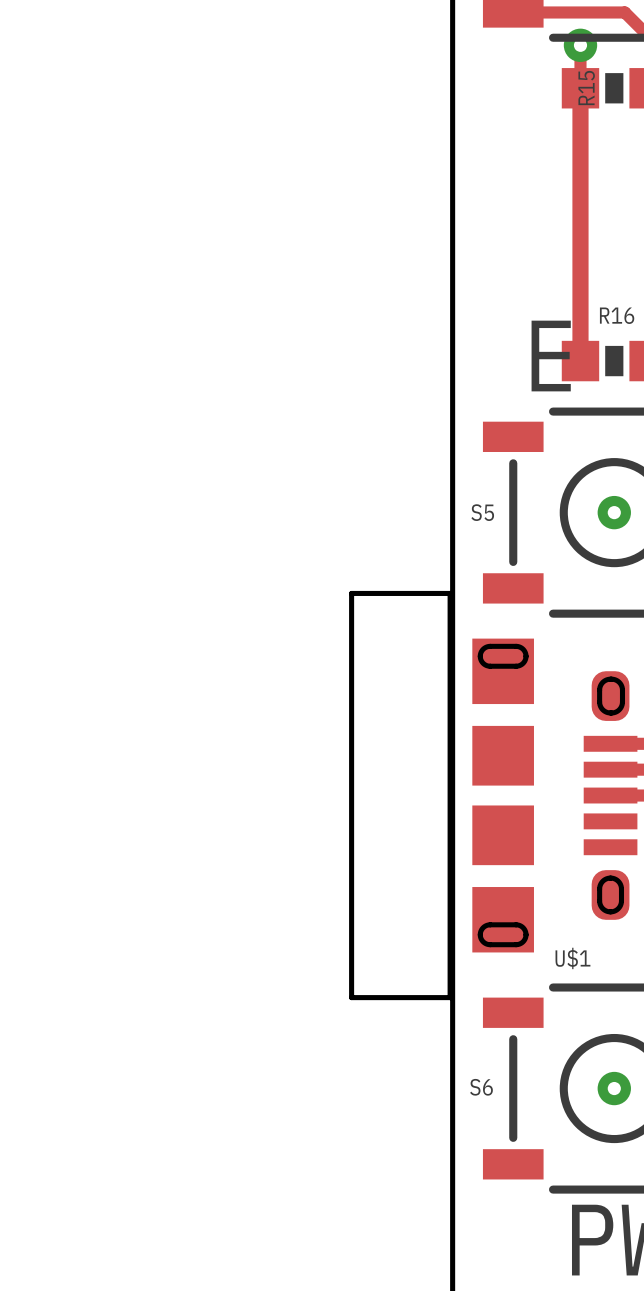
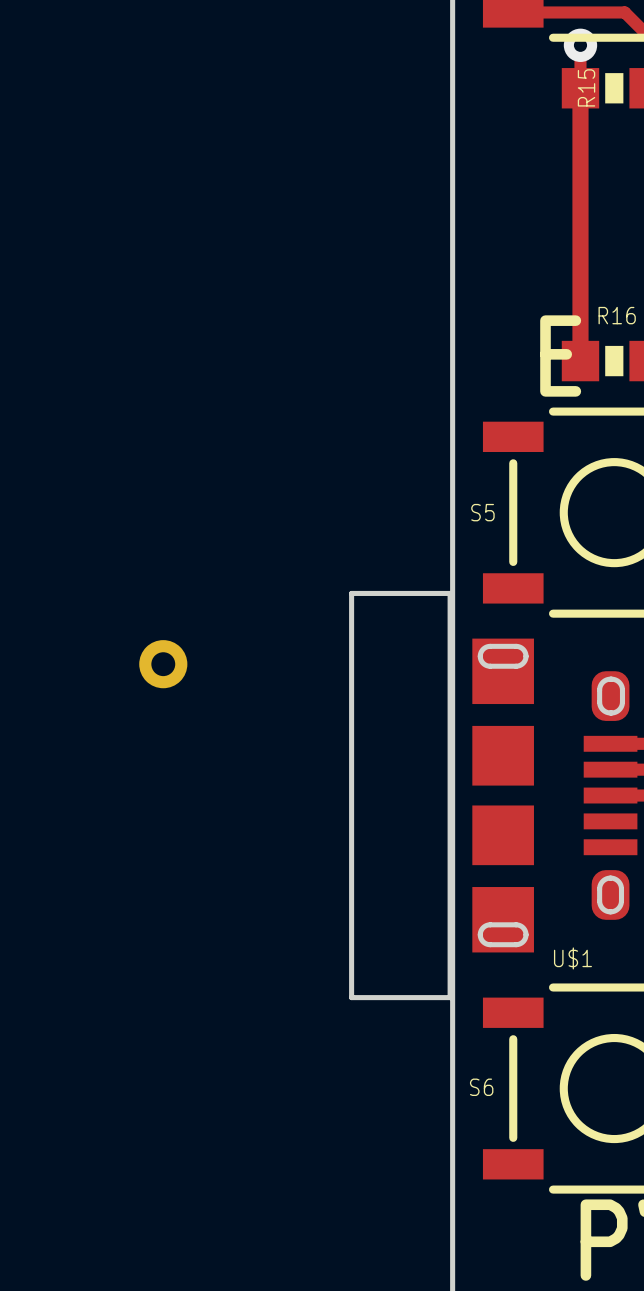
via: (614, 512) -> none
part: none -> (163, 664)
via: (614, 1088) -> none

